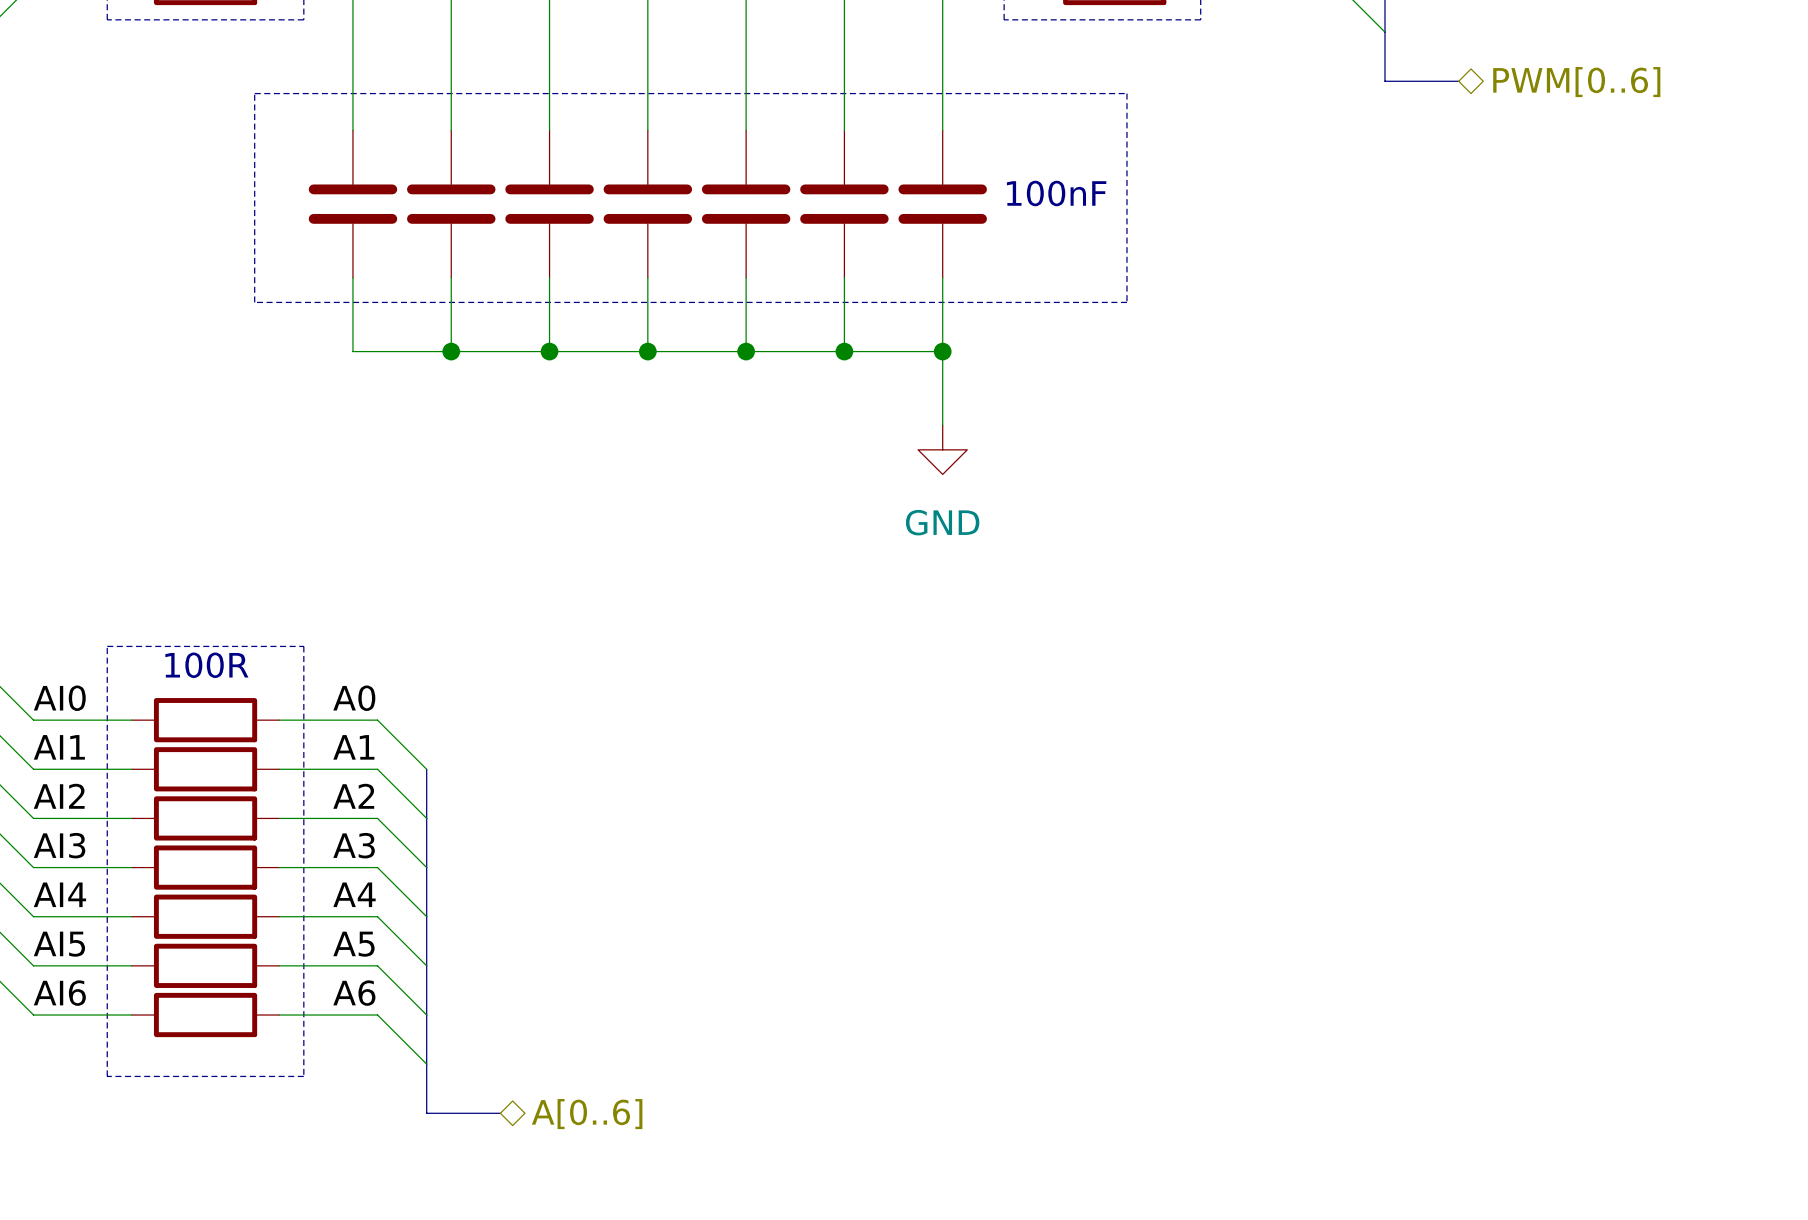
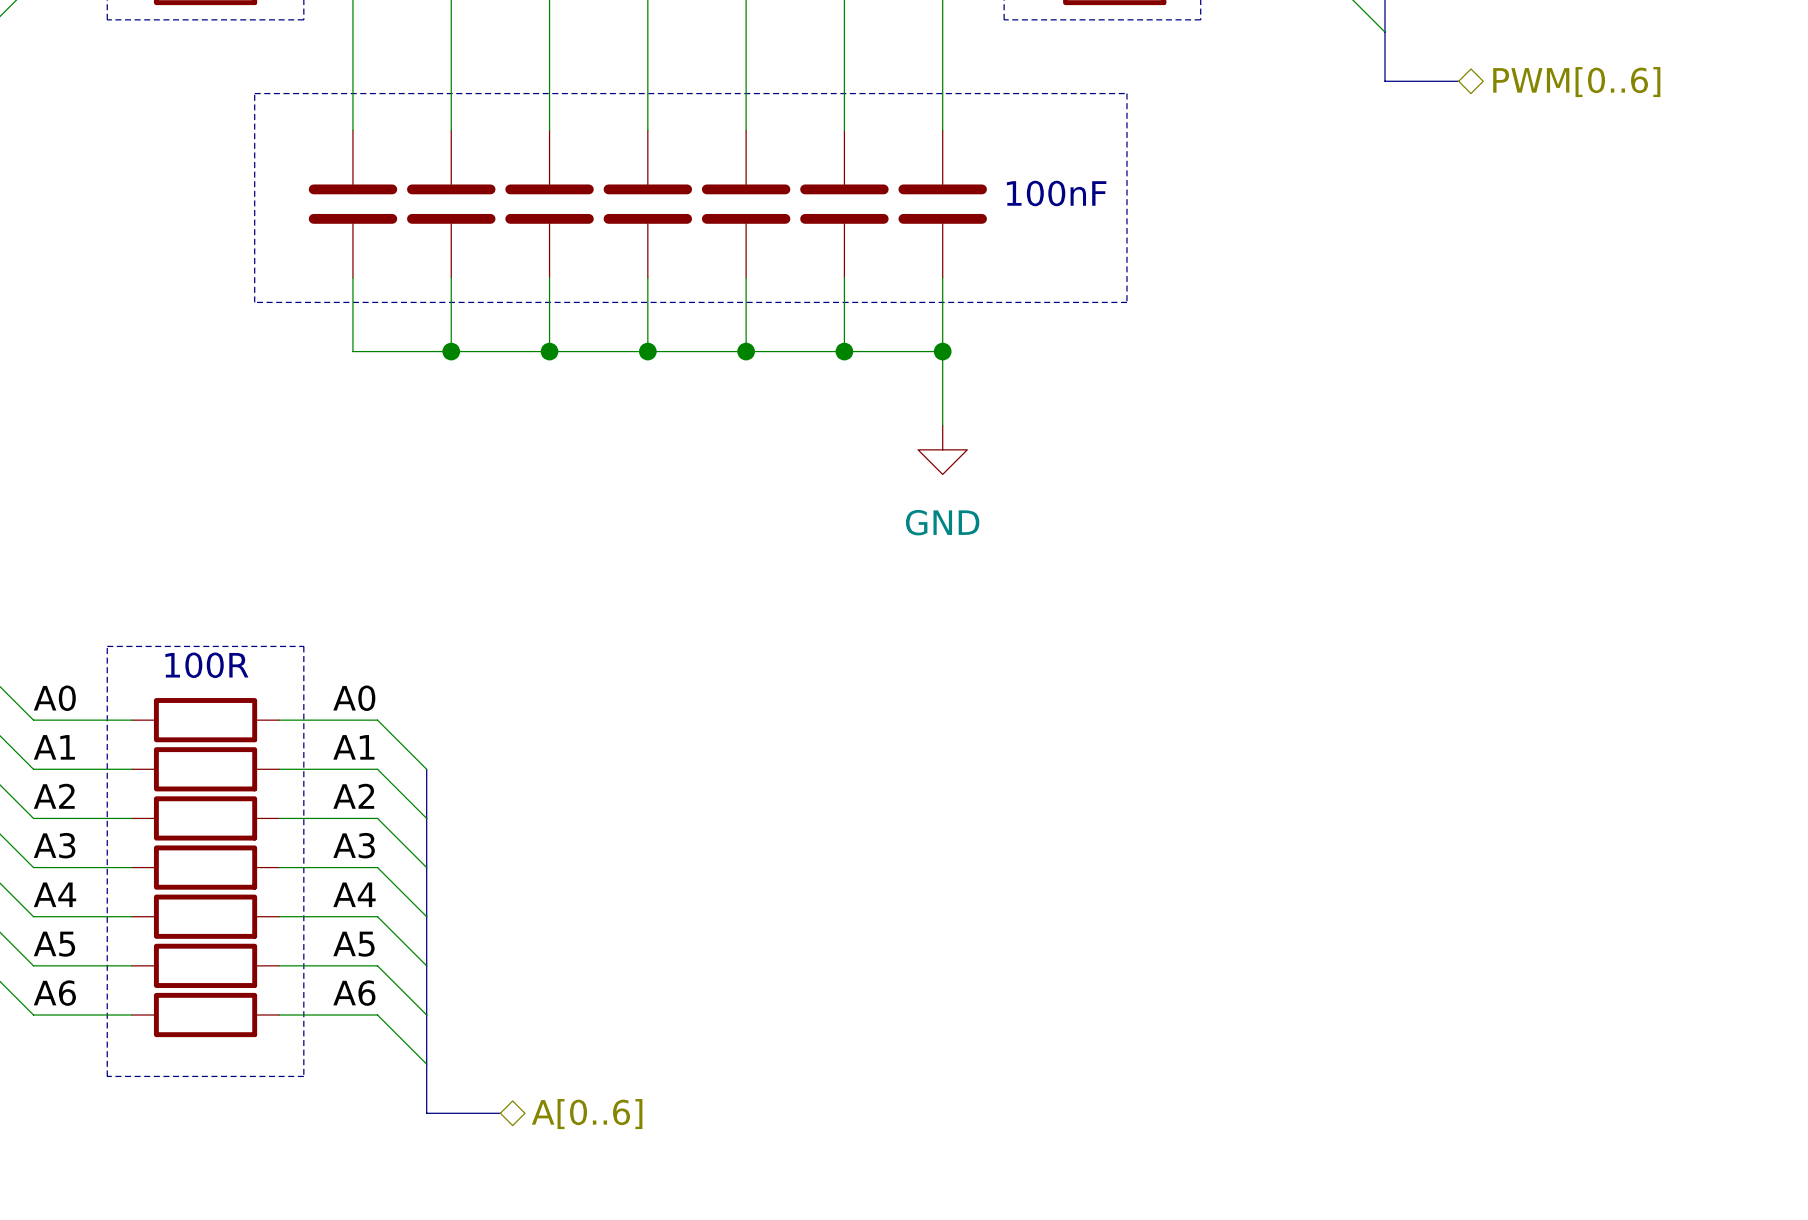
label: AI0 (59, 698) -> A0 (54, 698)
label: AI1 (59, 747) -> A1 (54, 747)
label: AI2 (59, 796) -> A2 (54, 796)
label: AI3 (59, 845) -> A3 (54, 845)
label: AI4 (59, 894) -> A4 (54, 894)
label: AI5 (59, 944) -> A5 (54, 944)
label: AI6 (59, 993) -> A6 (54, 993)

